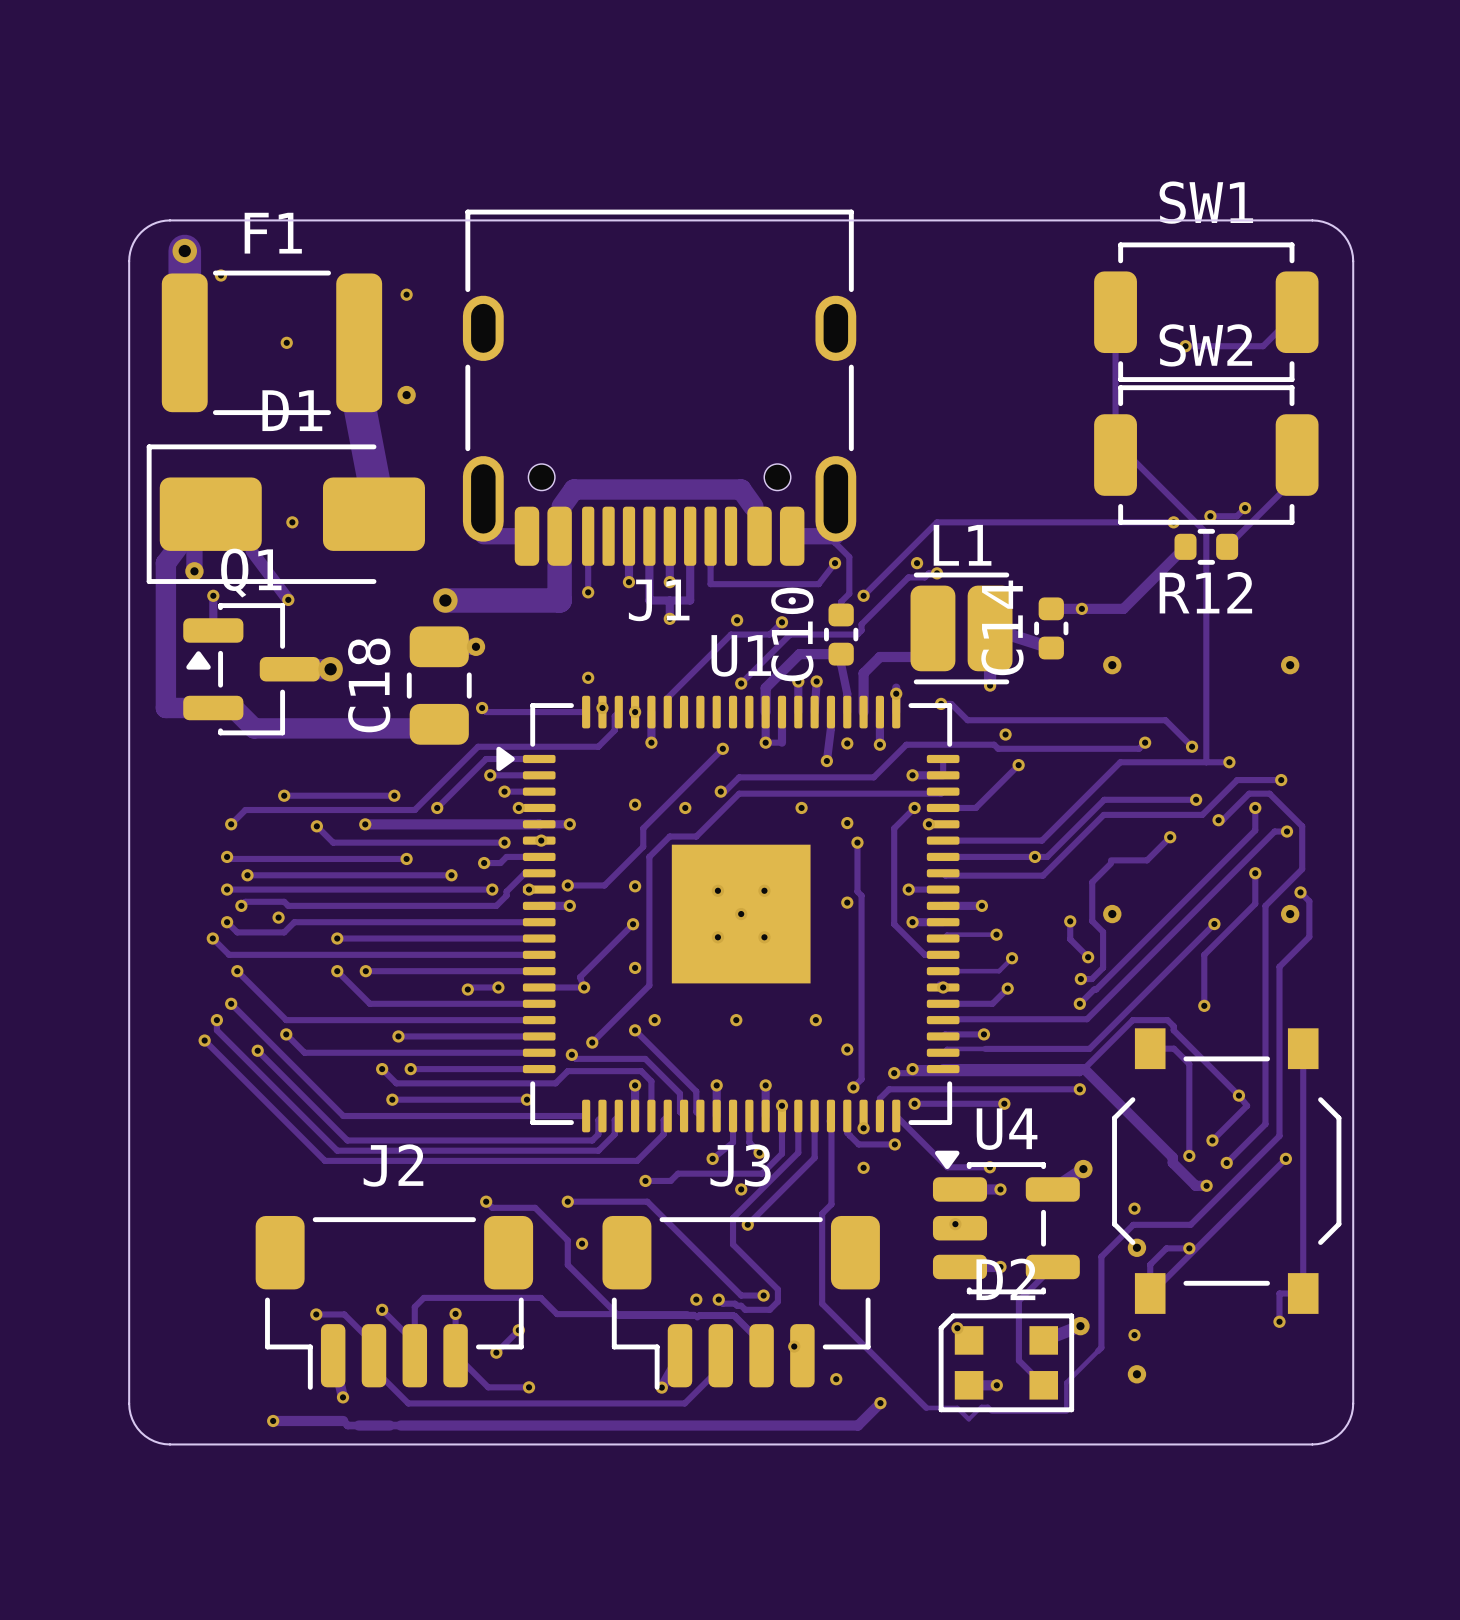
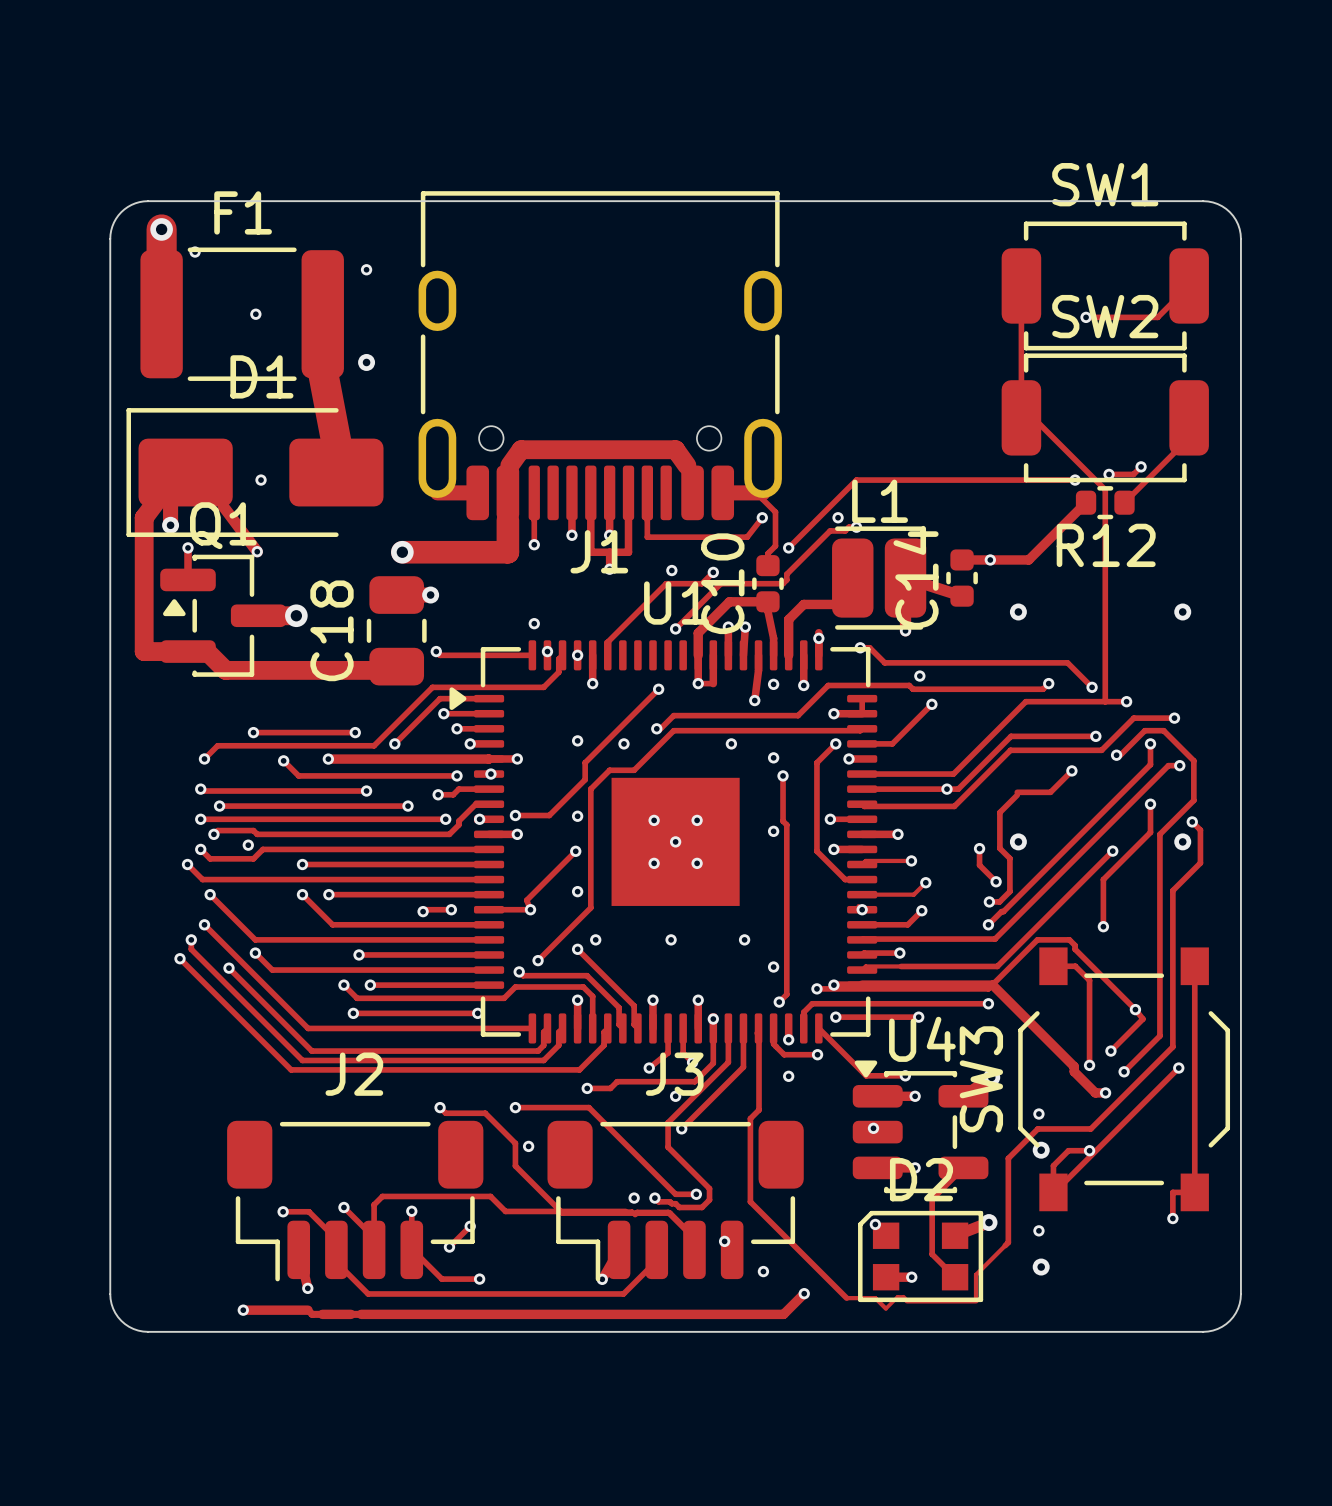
SW3 name: none -> SW3 (981, 1079)

